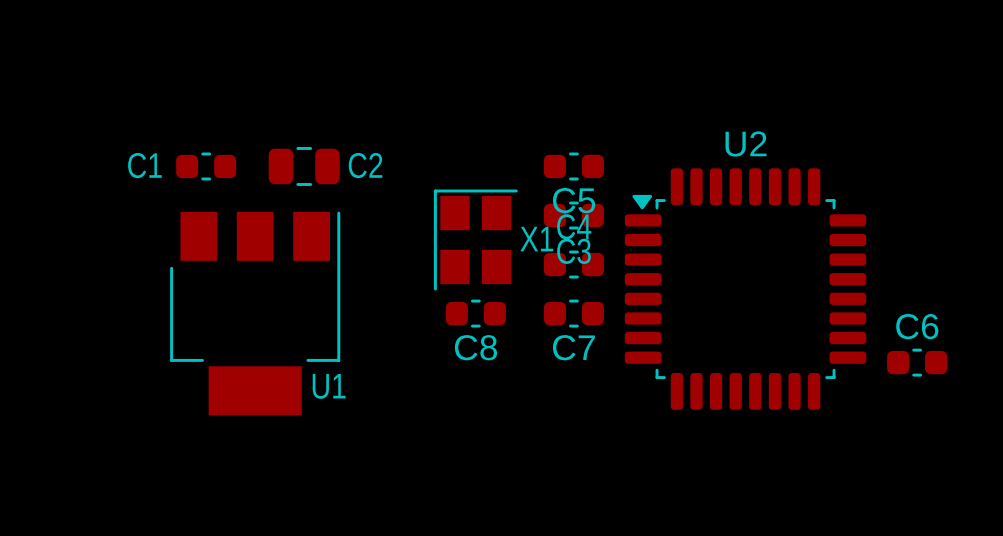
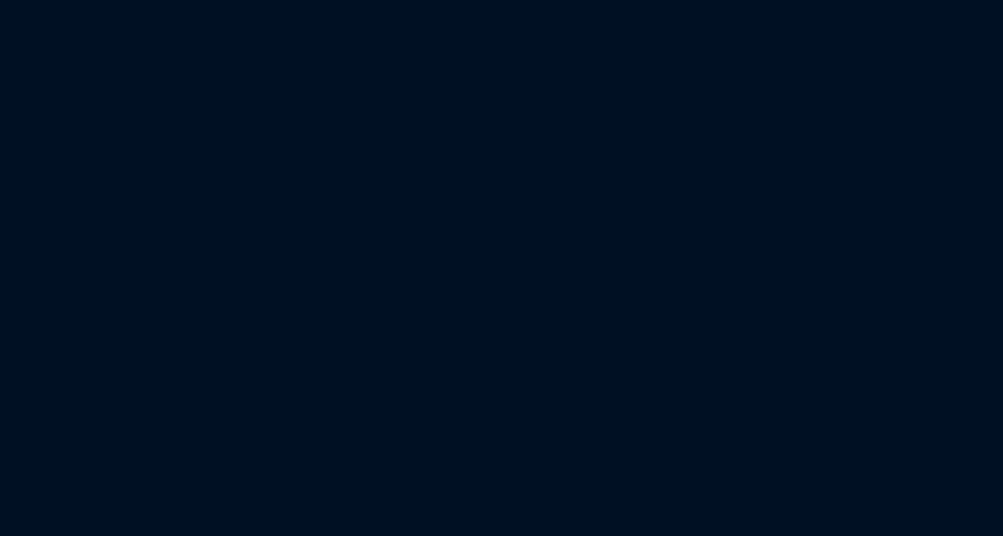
C1: (206, 166) -> none
C2: (304, 166) -> none
C5: (573, 166) -> none
C3: (573, 215) -> none
X1: (475, 240) -> none
C4: (573, 264) -> none
U2: (745, 289) -> none
U1: (255, 313) -> none
C8: (475, 313) -> none
C7: (573, 313) -> none
C6: (917, 362) -> none

